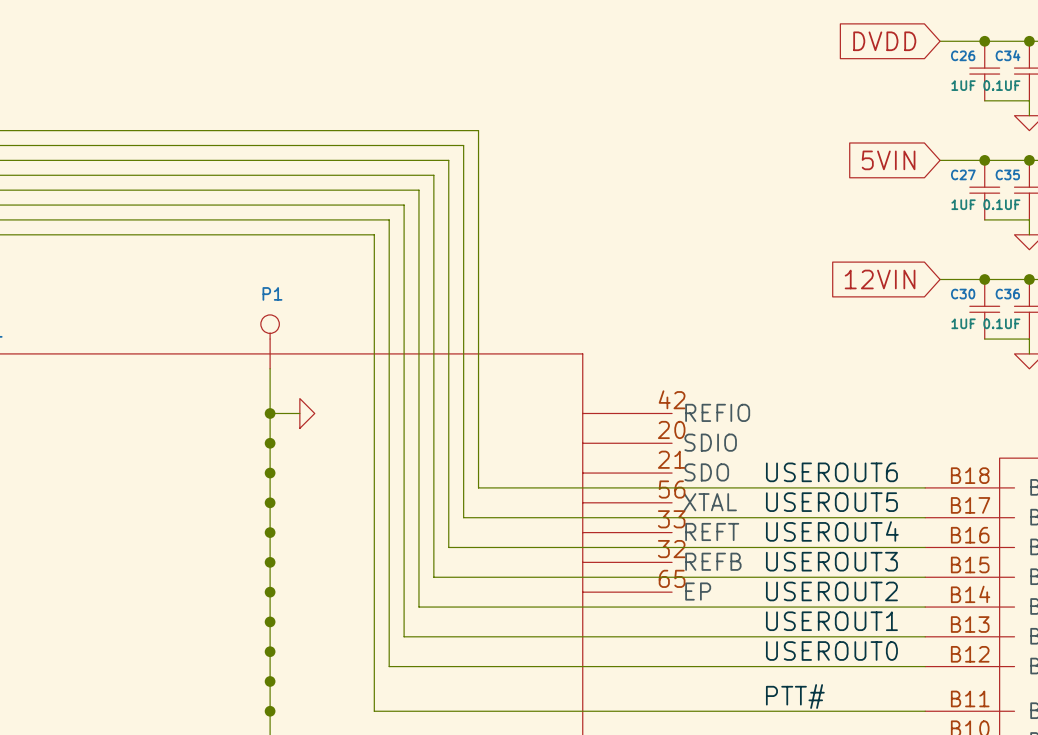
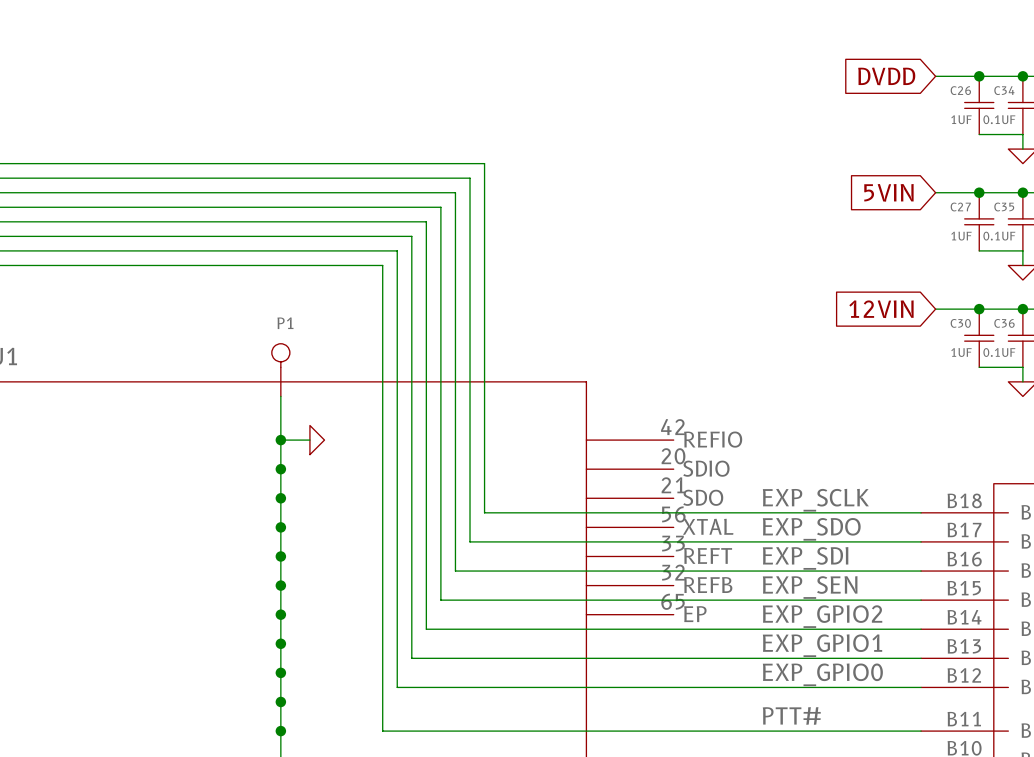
label: USEROUT6 (831, 472) -> EXP_SCLK (815, 500)
label: USEROUT5 (831, 502) -> EXP_SDO (811, 529)
label: USEROUT4 (832, 531) -> EXP_SDI (805, 558)
label: USEROUT3 (831, 561) -> EXP_SEN (810, 587)
label: USEROUT2 (831, 591) -> EXP_GPIO2 (822, 616)
label: USEROUT1 (831, 621) -> EXP_GPIO1 (822, 645)
label: USEROUT0 (831, 651) -> EXP_GPIO0 (822, 674)

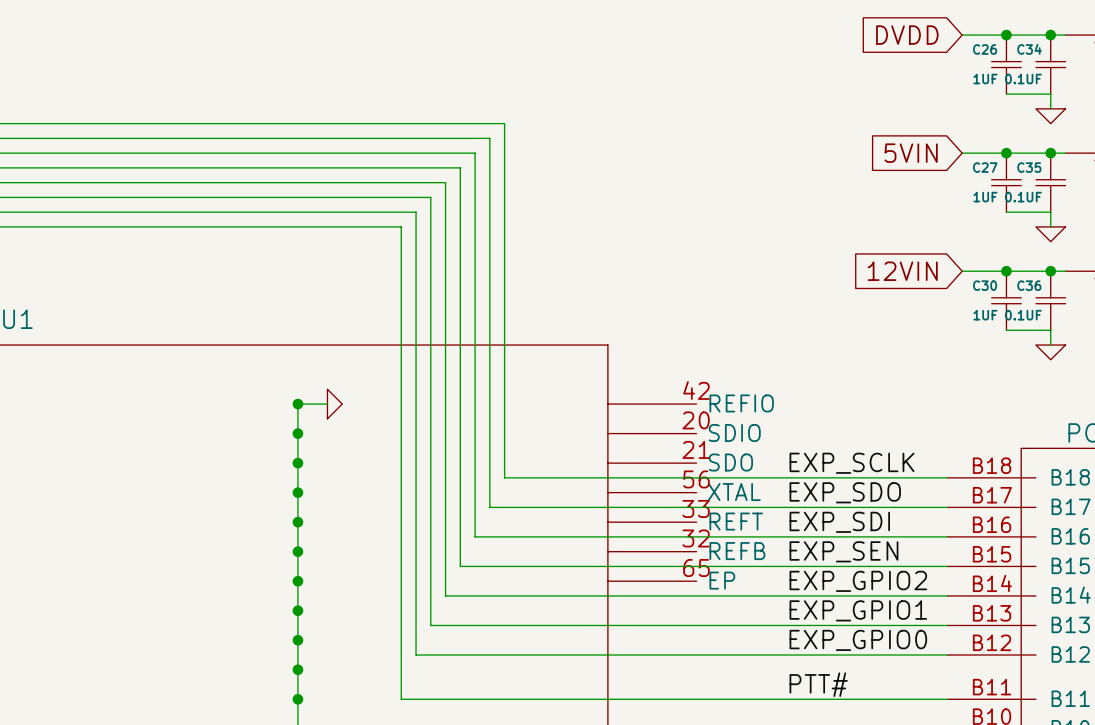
P1: (280, 370) -> none
wire: (280, 396) (280, 440) -> none

